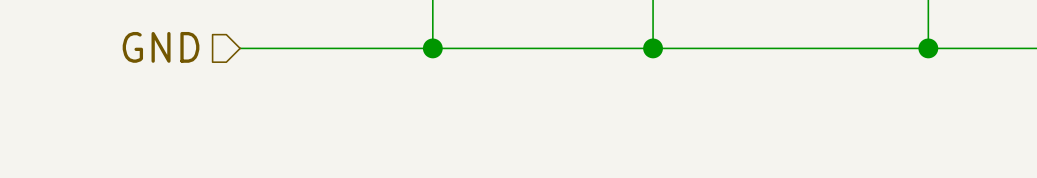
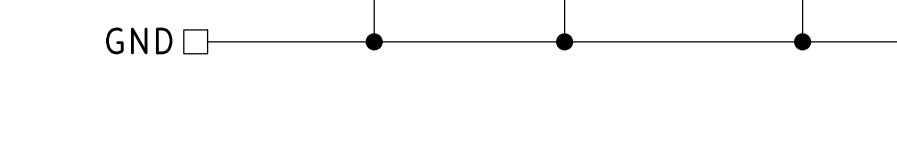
hierarchical label shape: input (161, 47) -> passive (139, 40)

